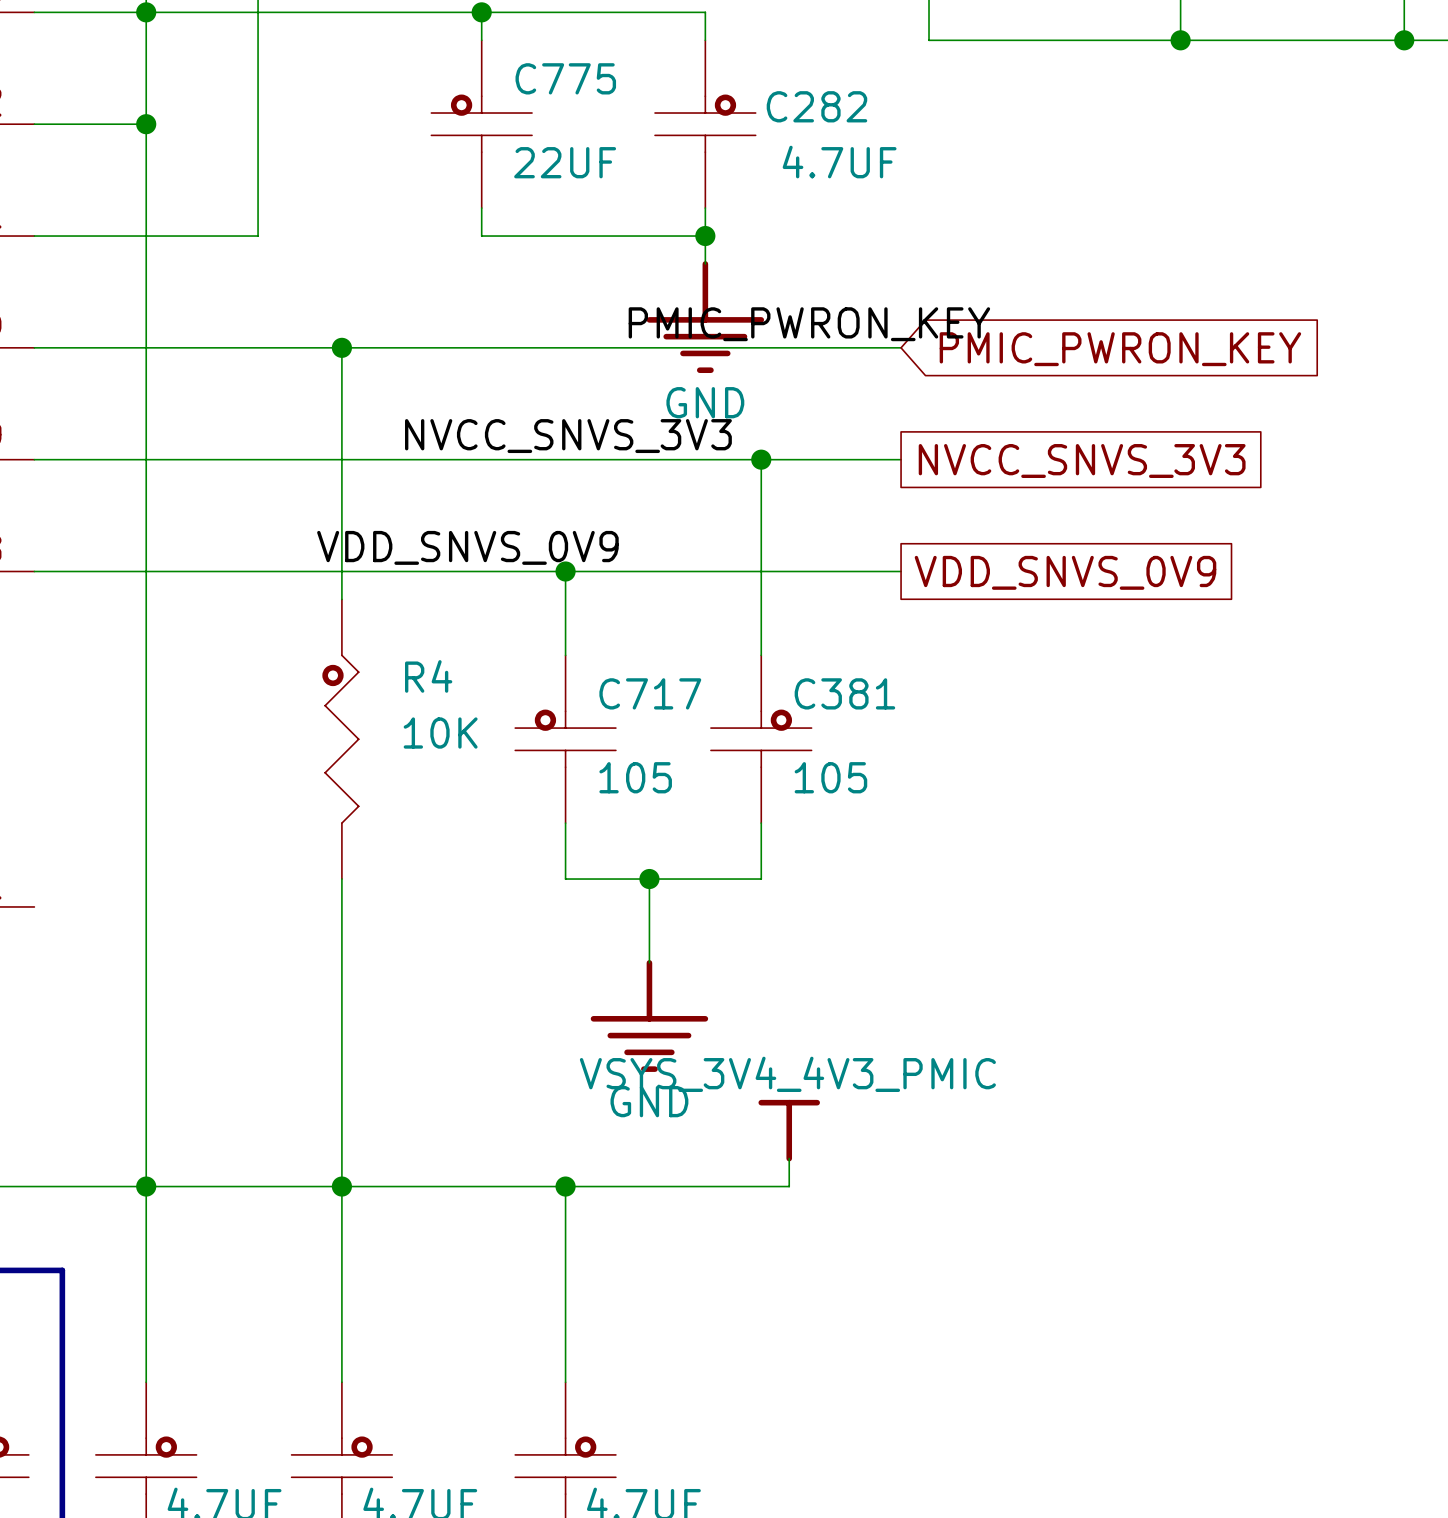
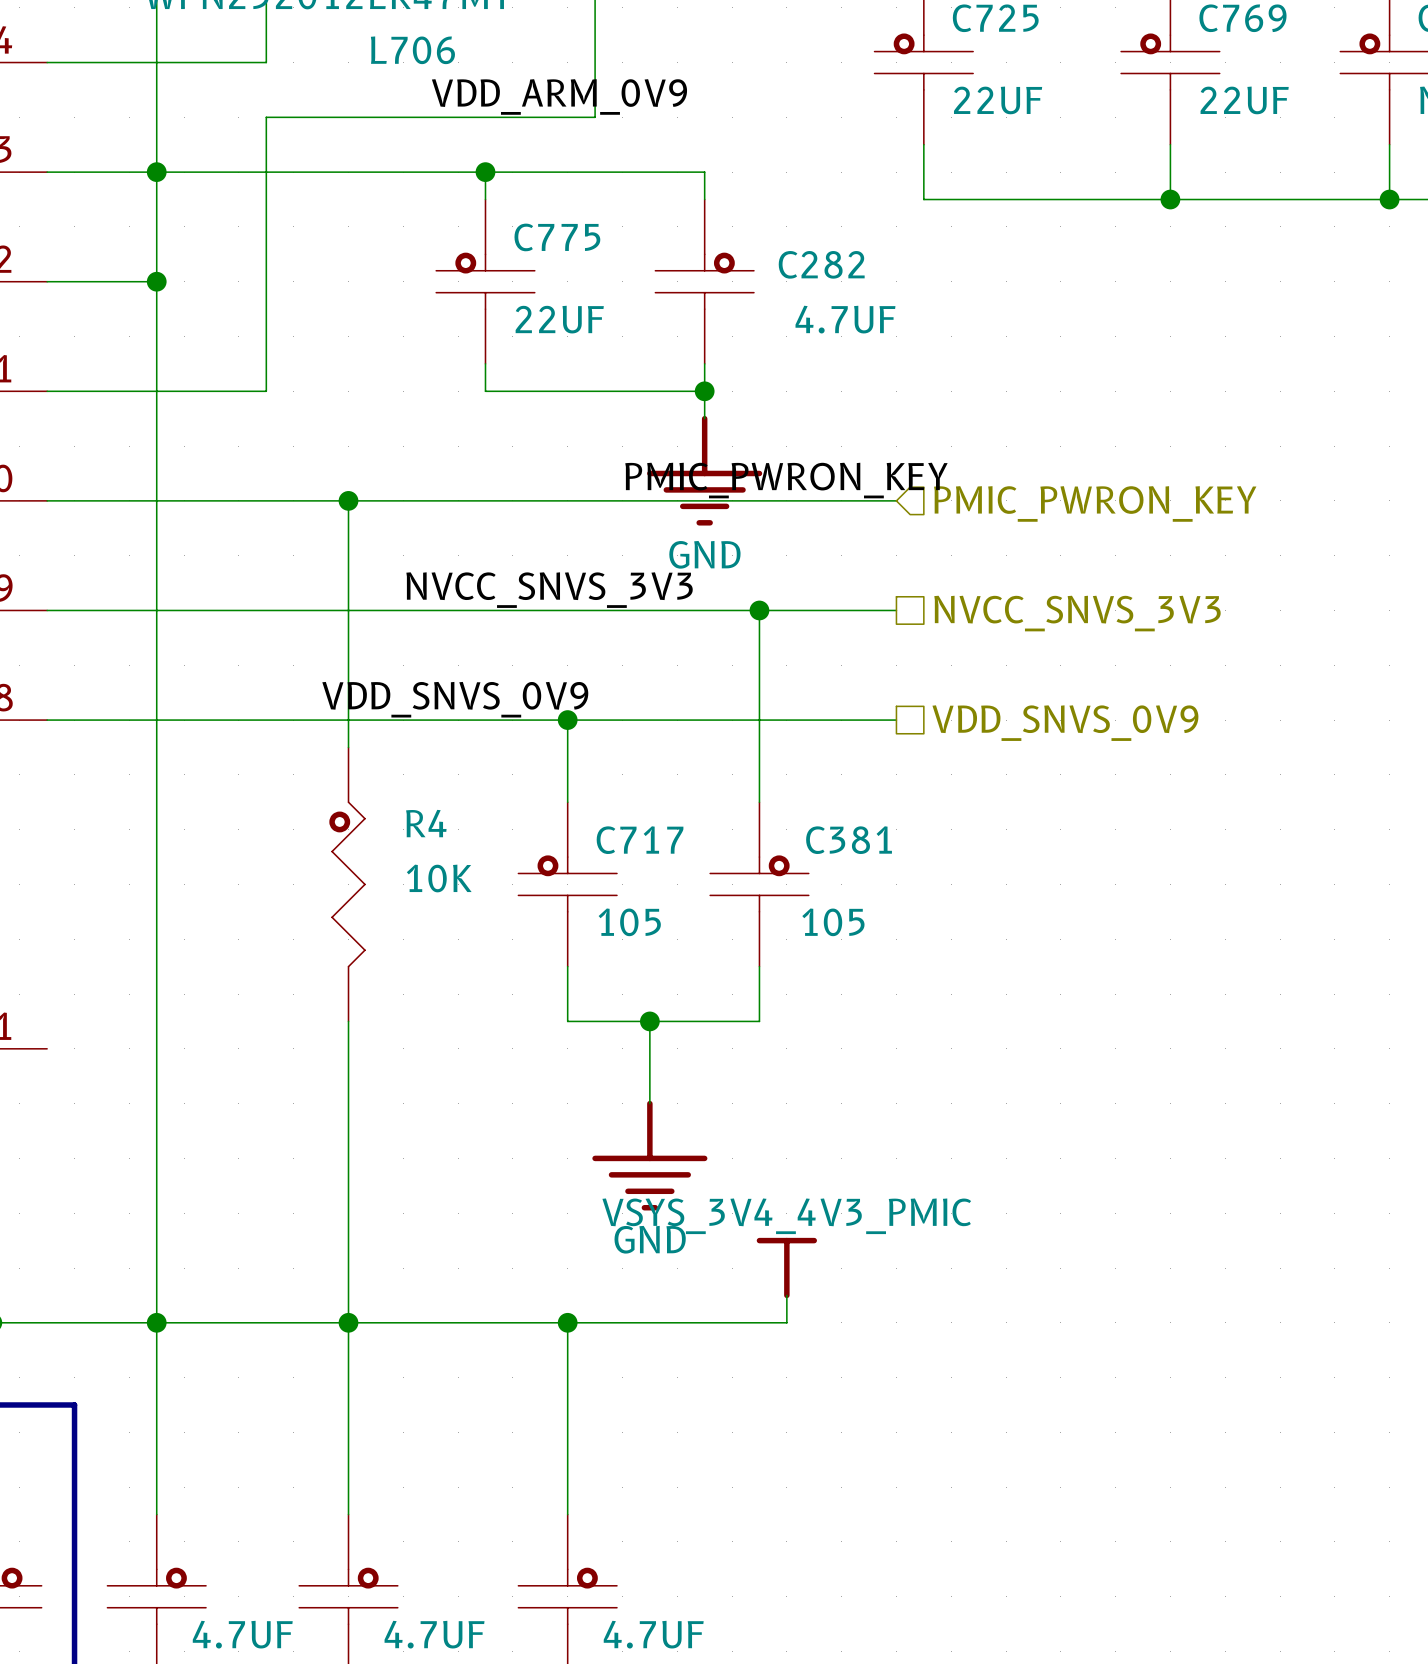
hierarchical label: none -> PMIC_PWRON_KEY (1095, 503)
global label: PMIC_PWRON_KEY (1120, 349) -> none
hierarchical label: none -> NVCC_SNVS_3V3 (1077, 613)
global label: NVCC_SNVS_3V3 (1082, 461) -> none
hierarchical label: none -> VDD_SNVS_0V9 (1065, 723)
global label: VDD_SNVS_0V9 (1065, 572) -> none

